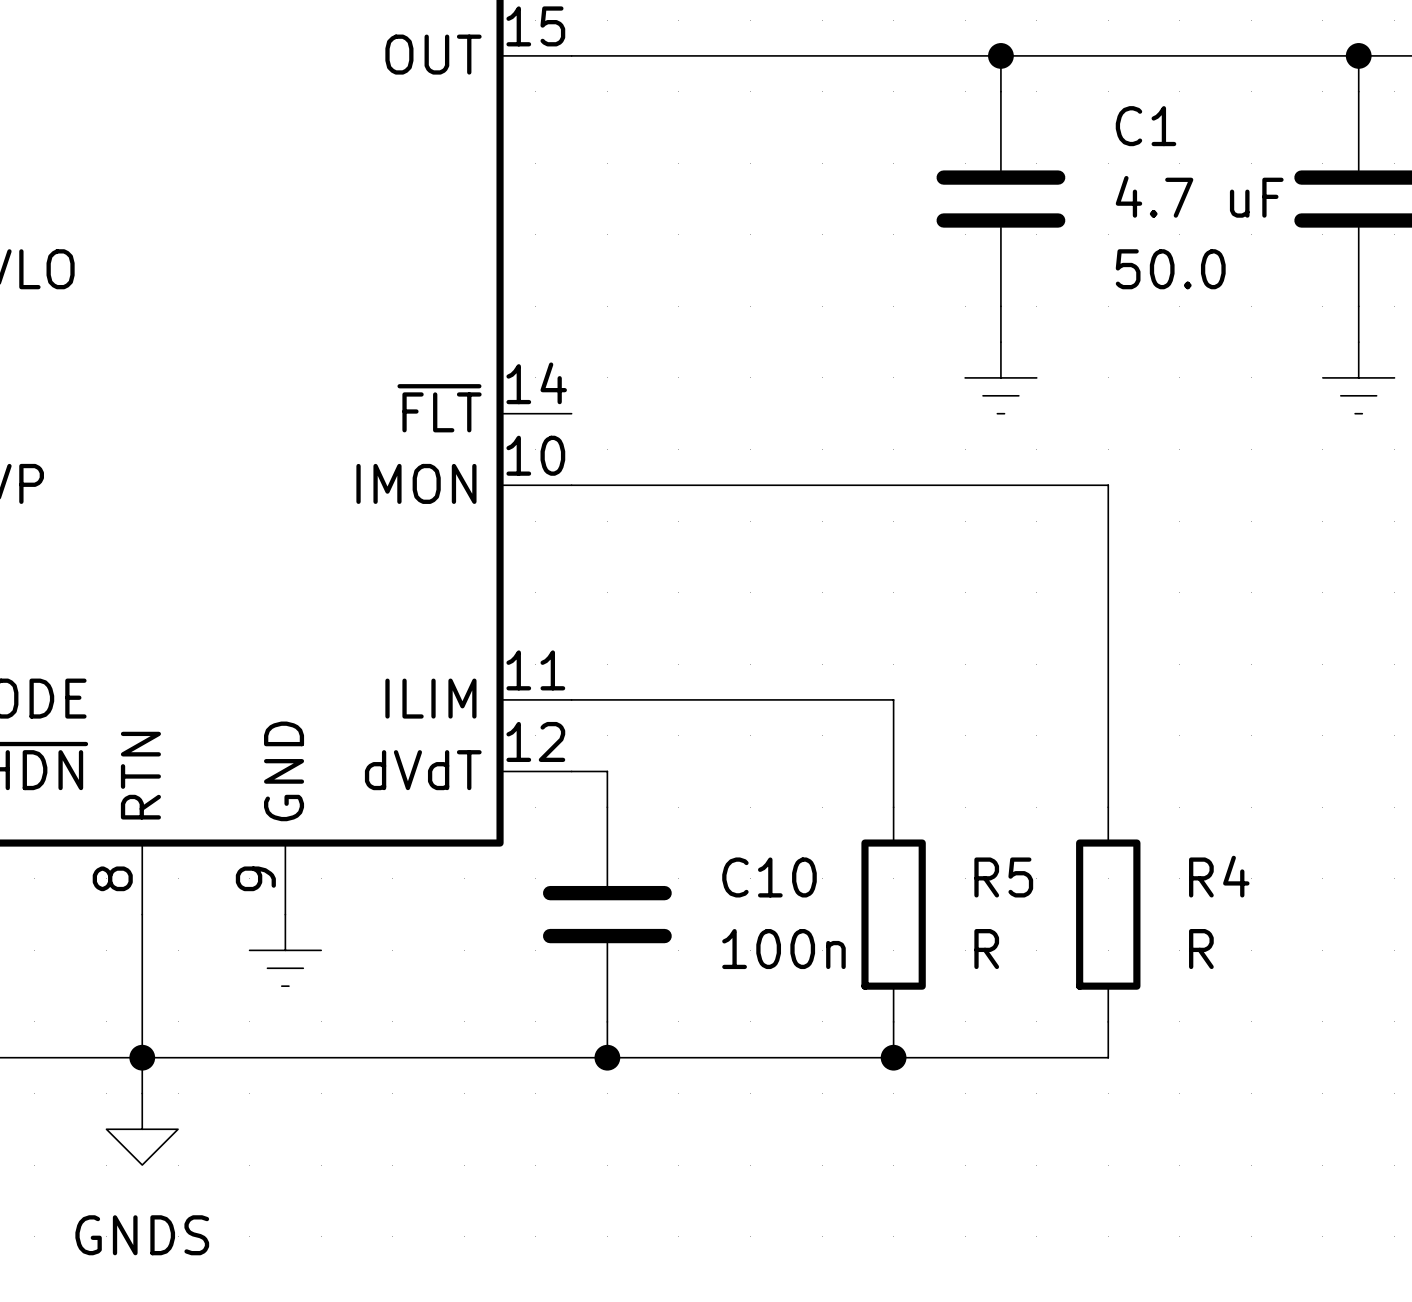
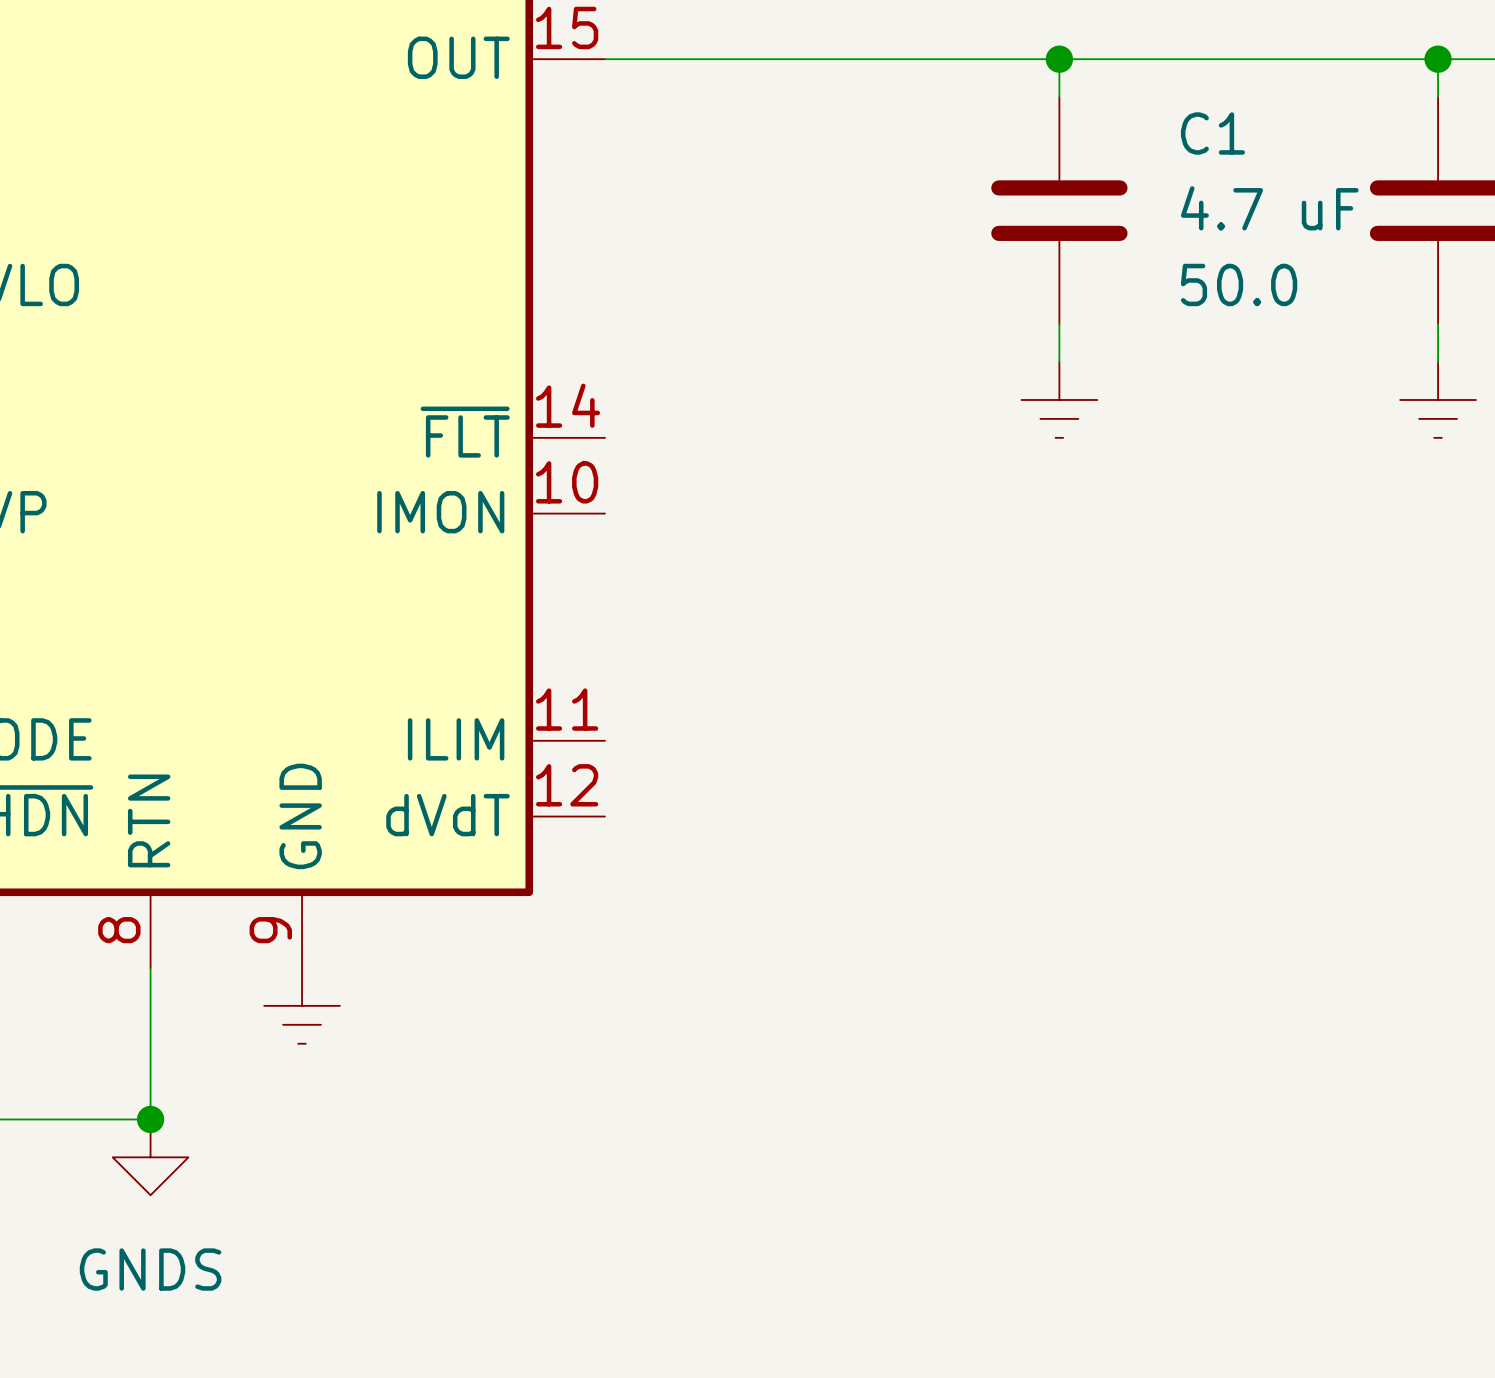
wire: (571, 485) (1108, 485) (1108, 807) -> none
wire: (571, 699) (893, 699) (893, 807) -> none
wire: (571, 771) (607, 771) (607, 807) -> none
C10: 100n (607, 914) -> none
R5: R (893, 914) -> none
R4: R (1108, 914) -> none
wire: (607, 1021) (607, 1057) -> none
wire: (893, 1021) (893, 1057) -> none
wire: (1108, 1021) (1108, 1057) (142, 1057) (142, 1093) -> none
junction: (607, 1057) -> none
junction: (893, 1057) -> none
power symbol position: GNDS (142, 1129) -> GNDS (150, 1157)

